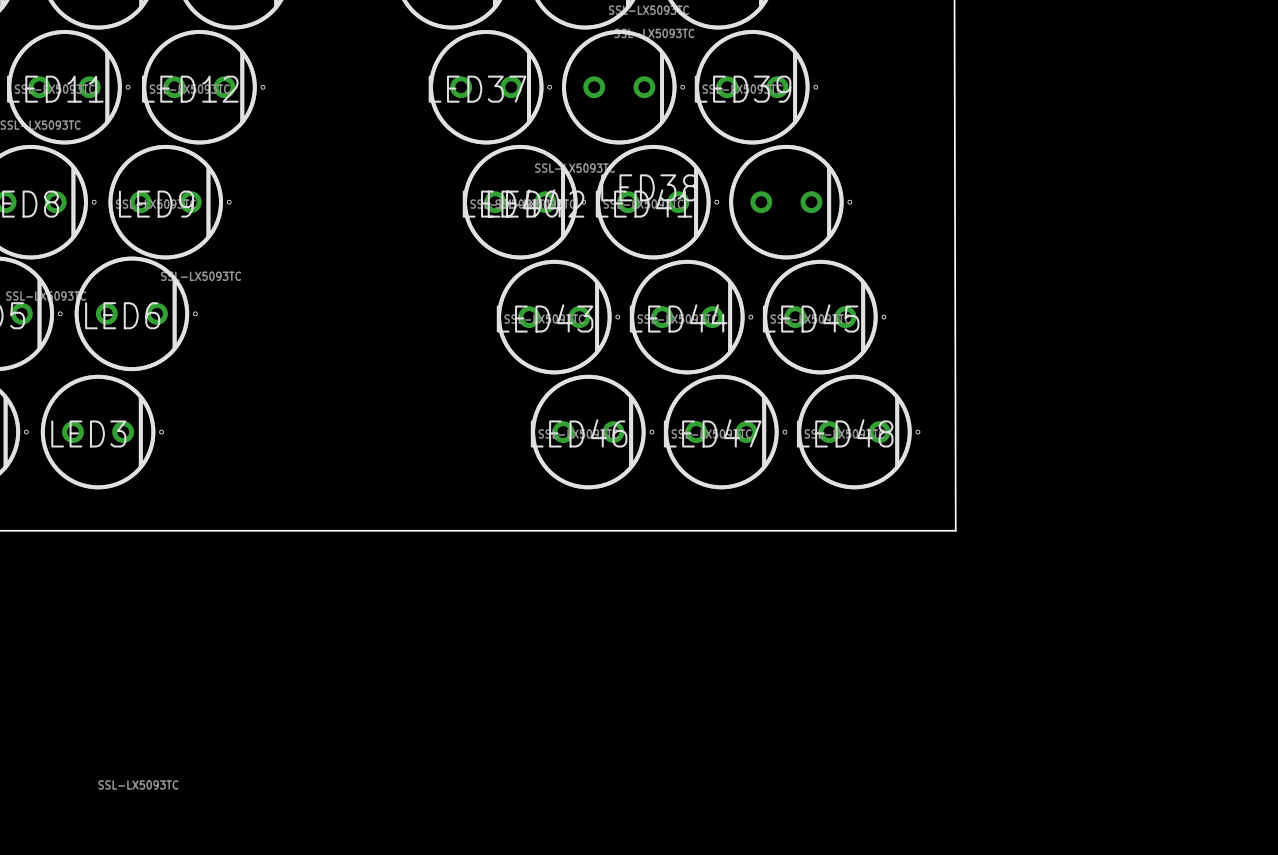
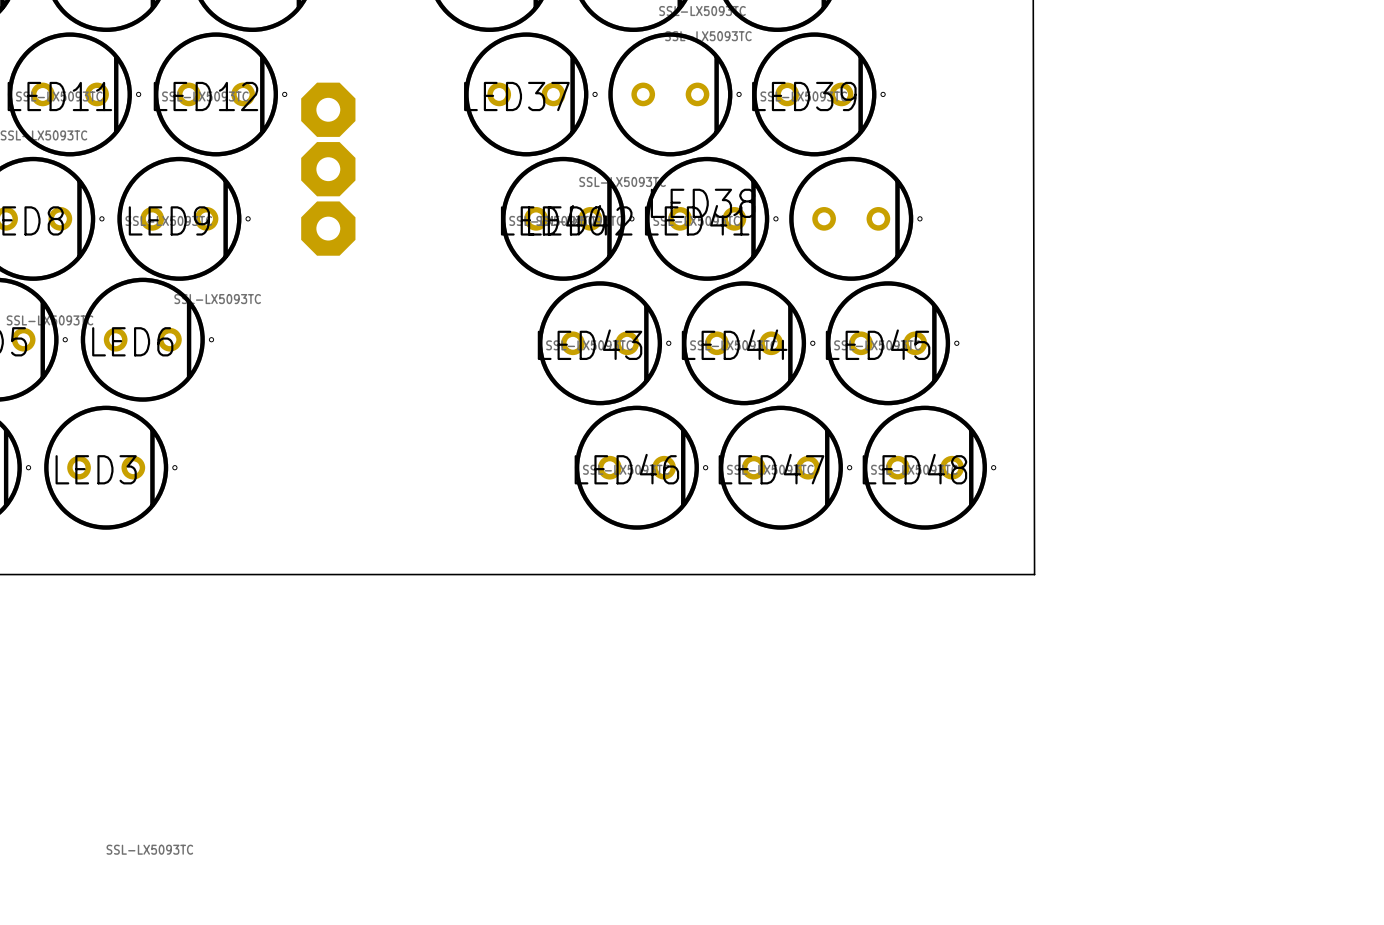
part: none -> (328, 109)
part: none -> (328, 169)
part: none -> (328, 228)

